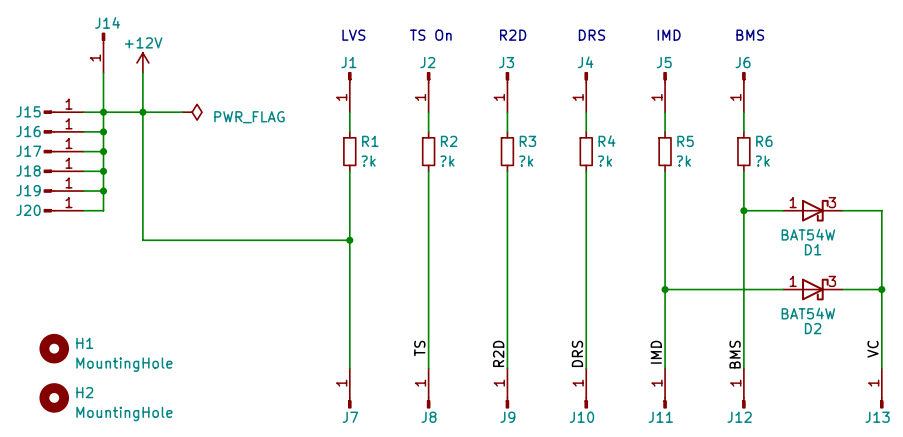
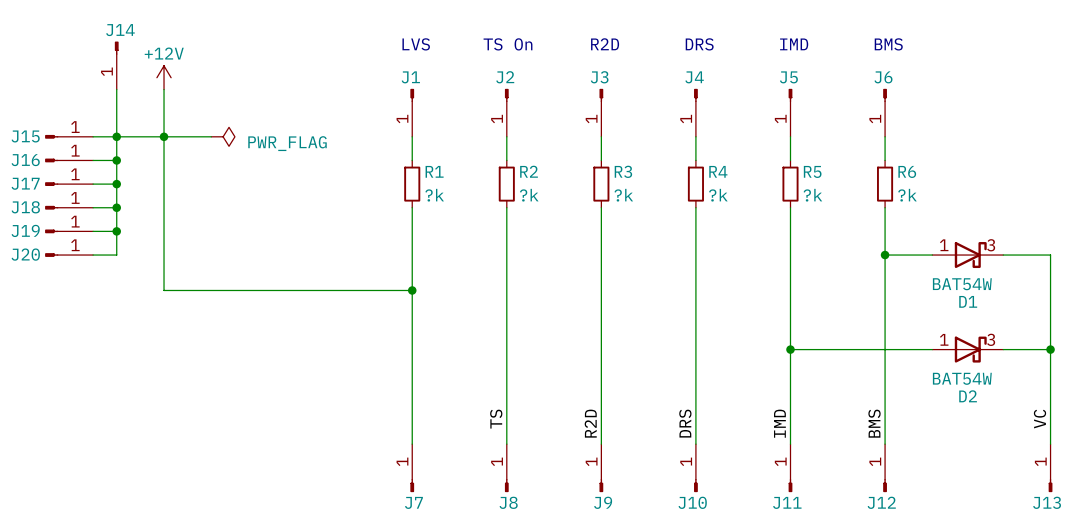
H1: MountingHole (54, 348) -> none
H2: MountingHole (54, 397) -> none

